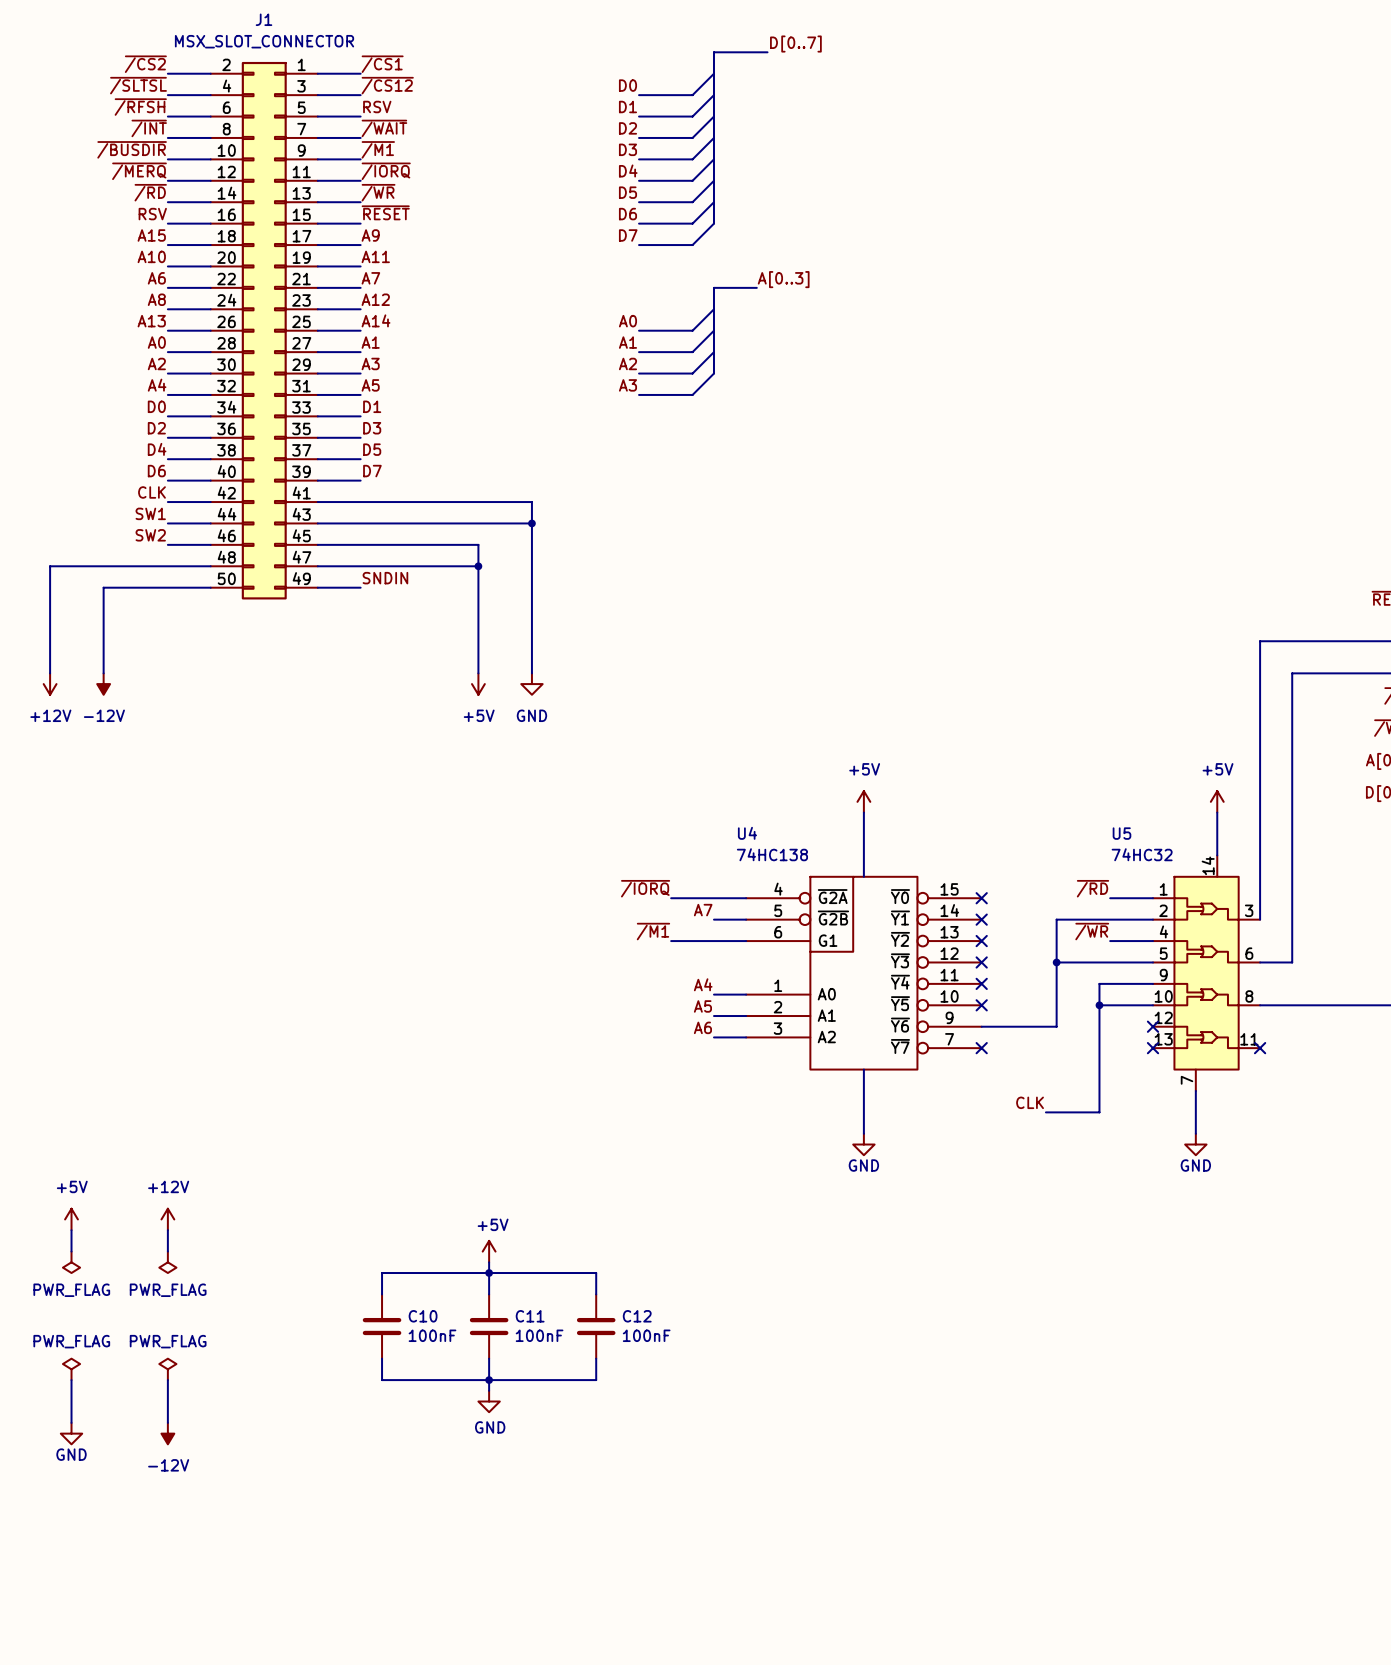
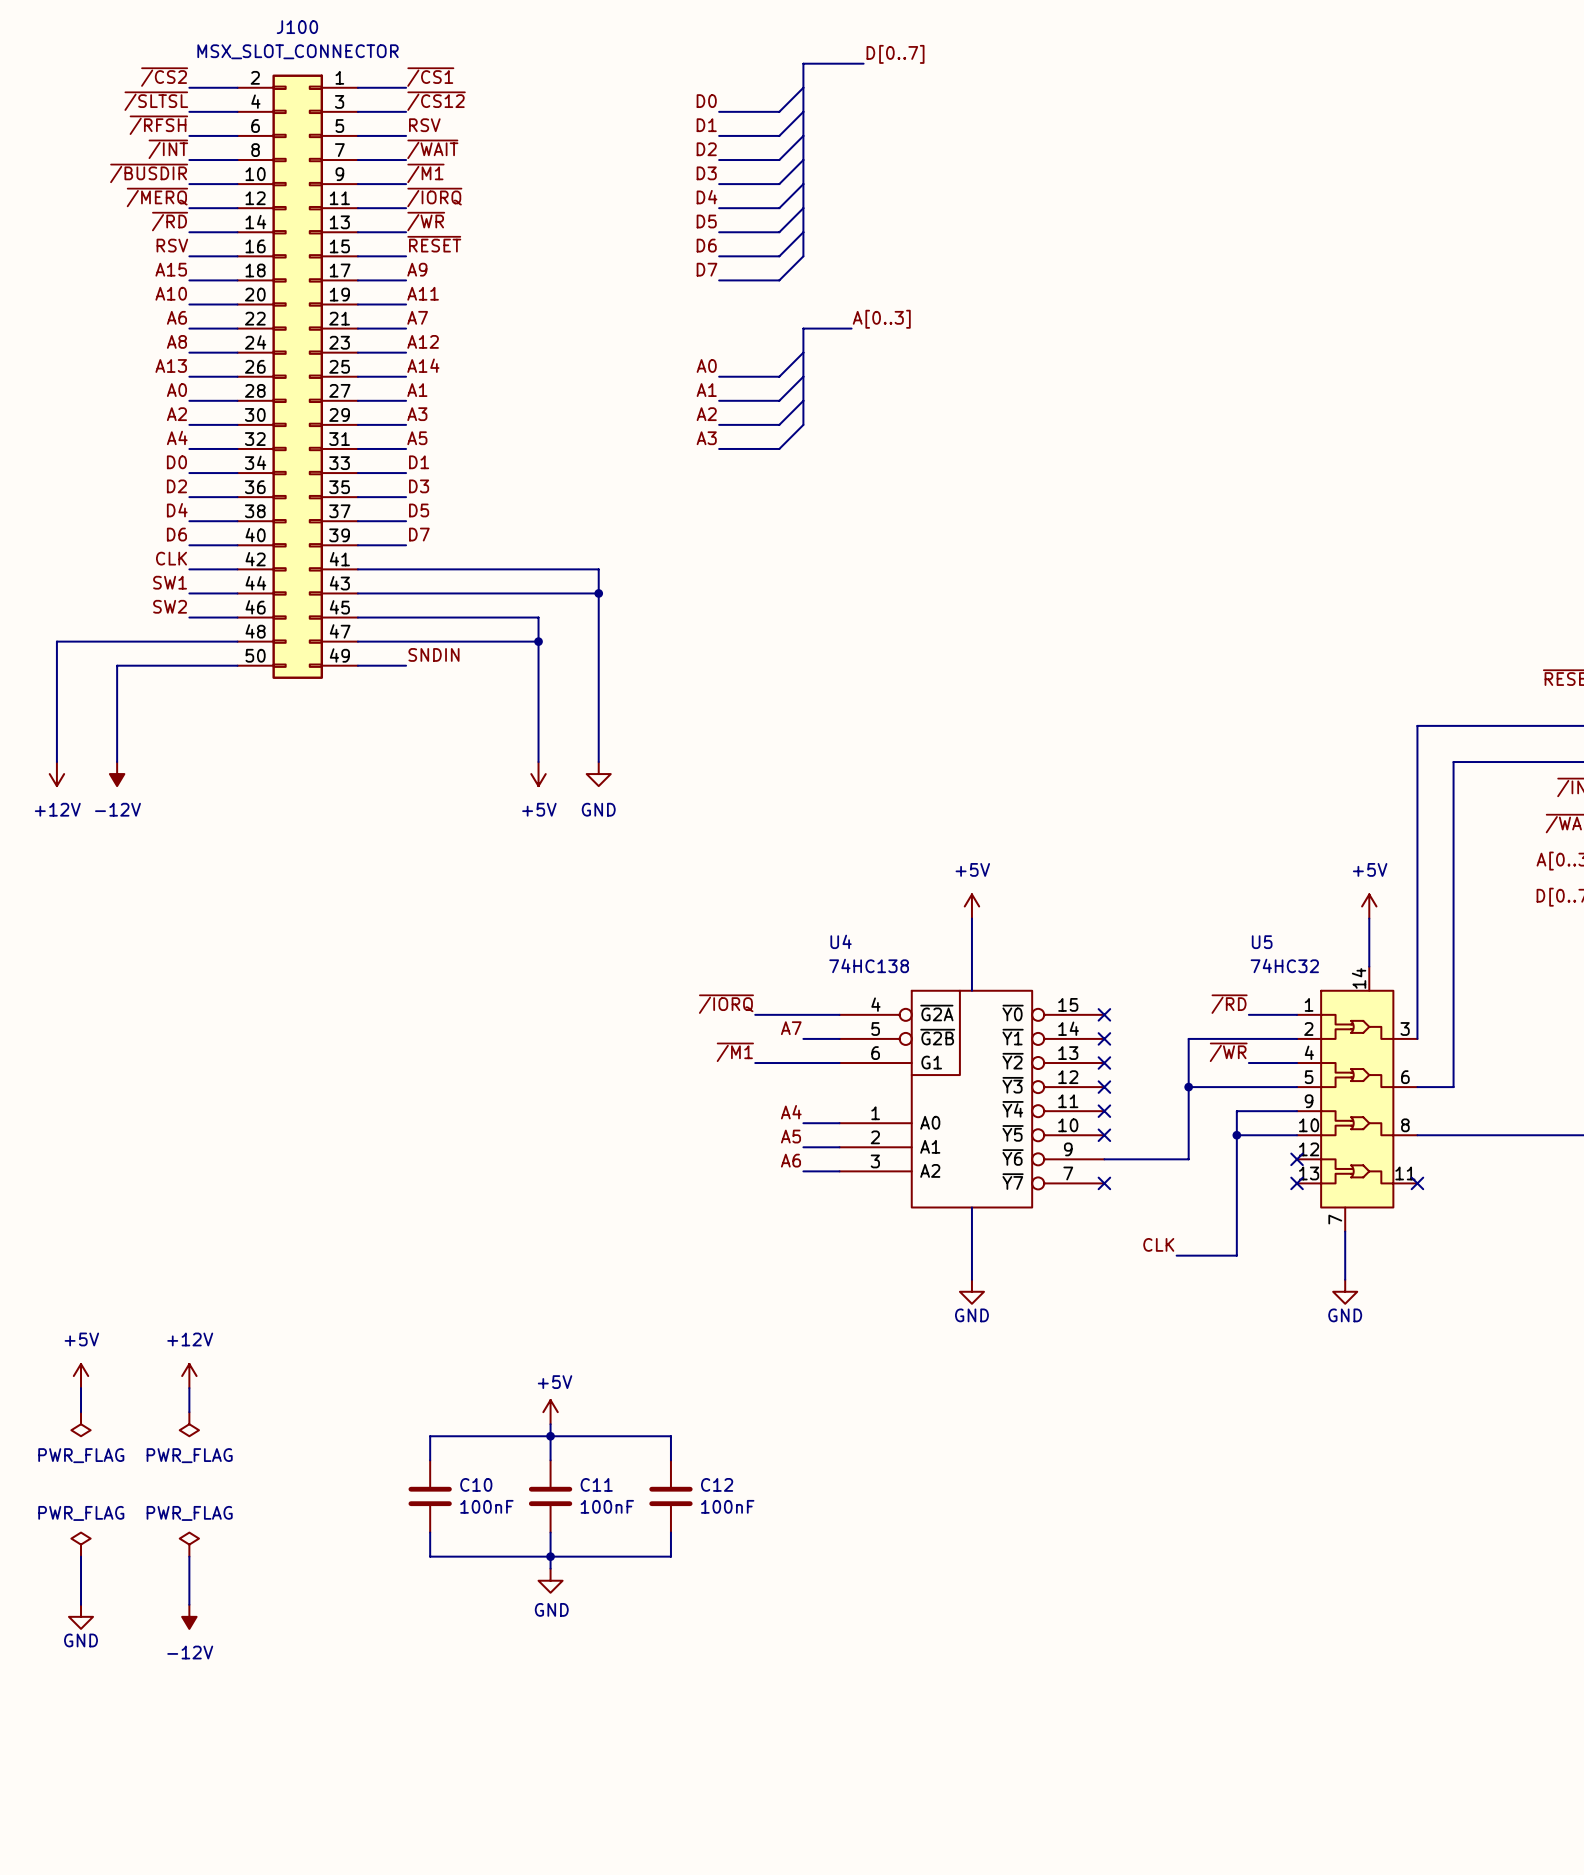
J1 name: J1 (264, 19) -> J100 (297, 27)

